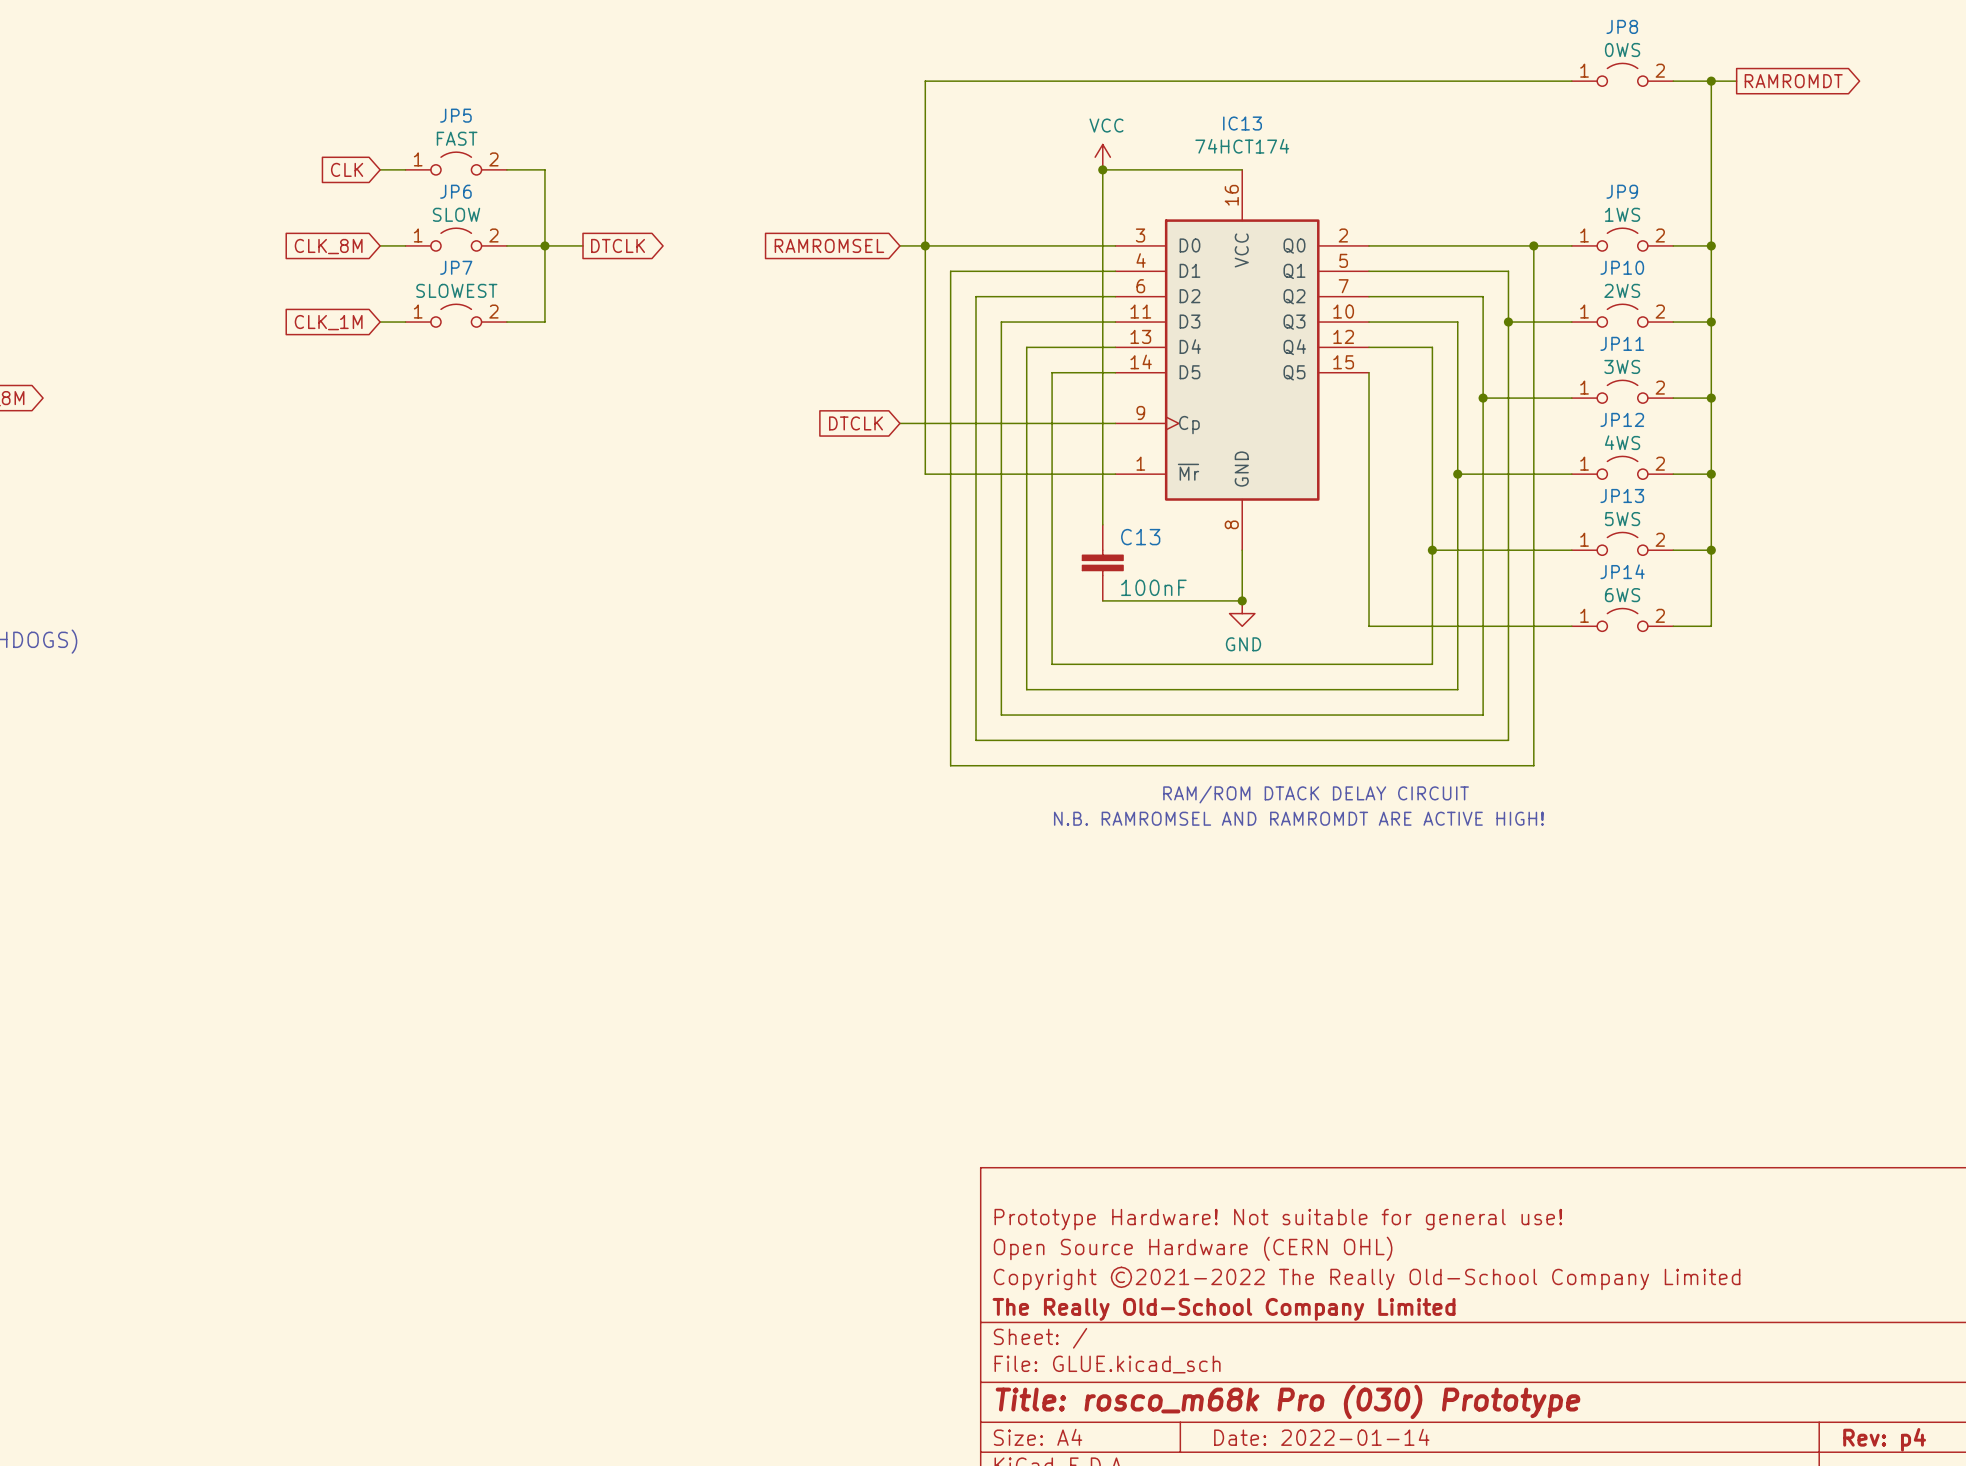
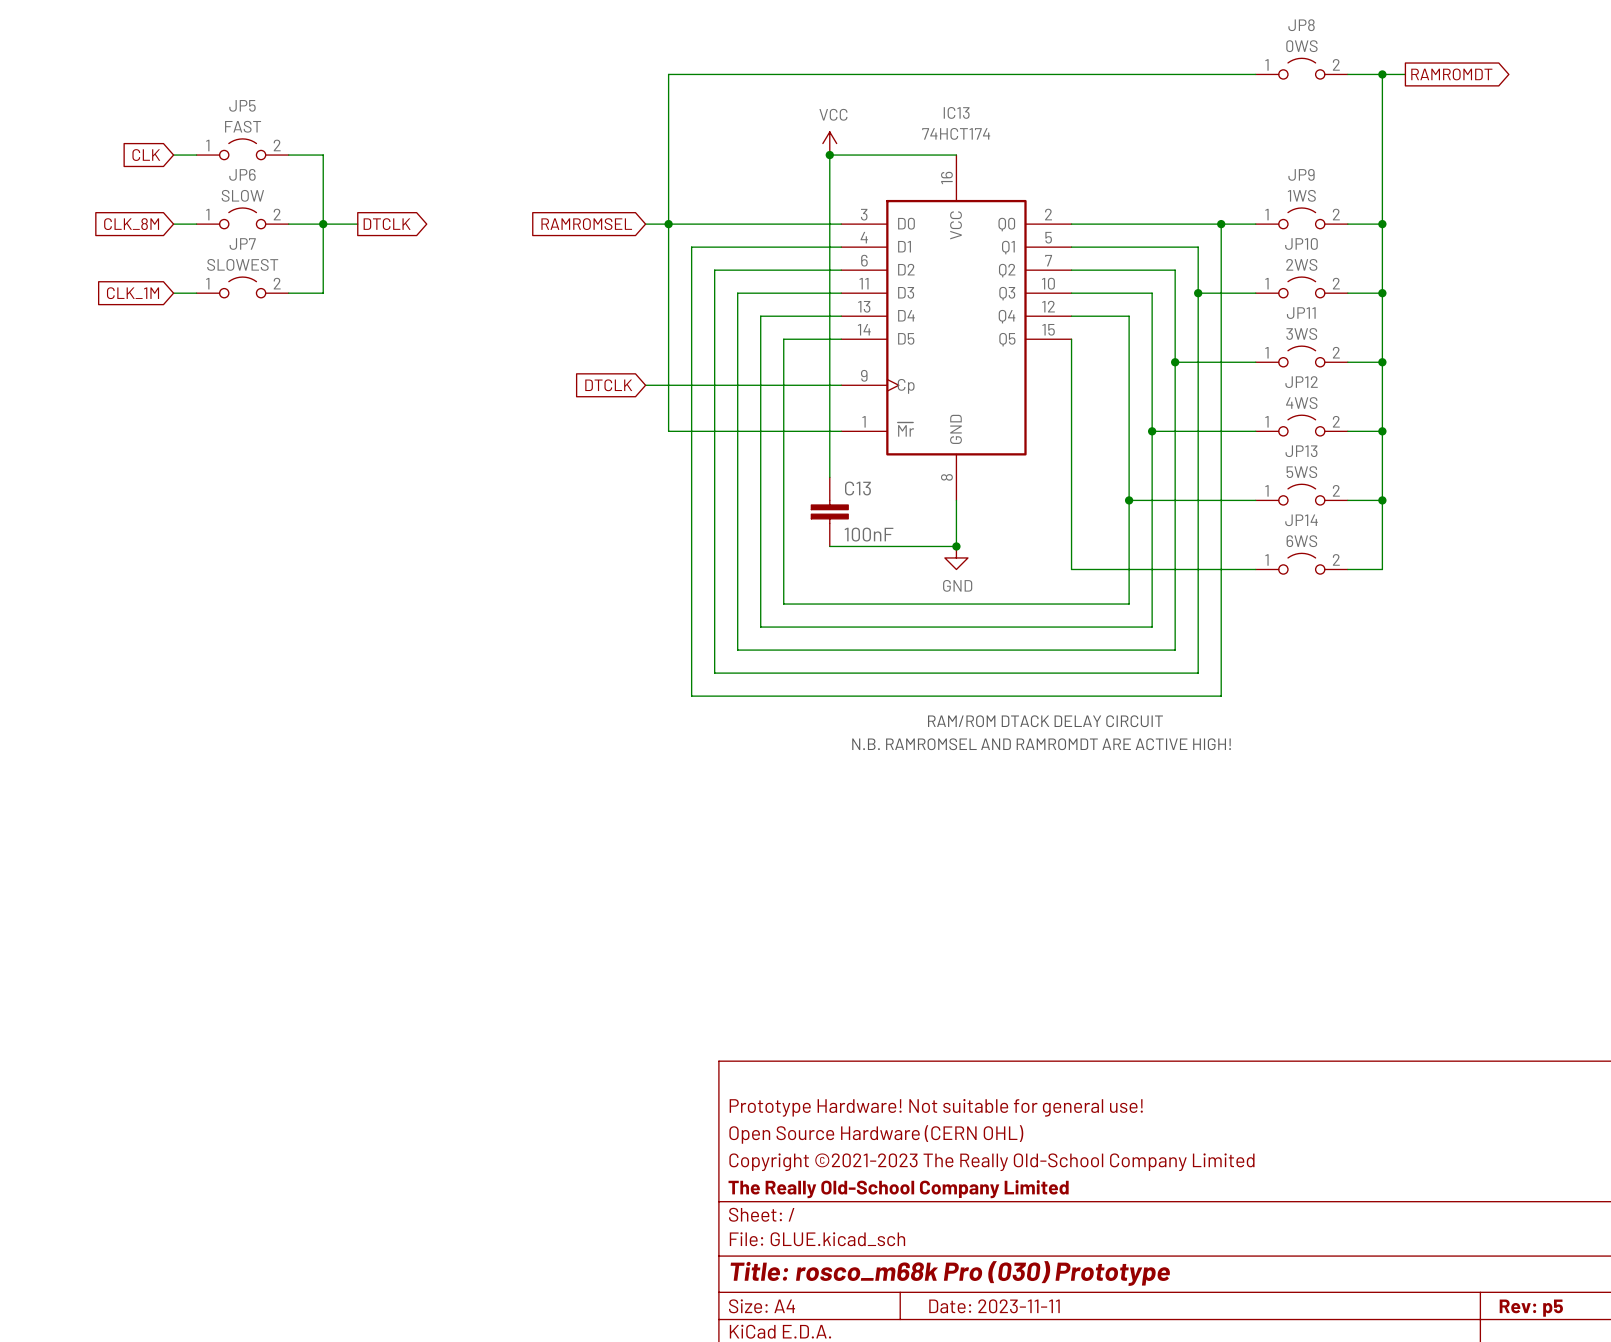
title block: Copyright ©2021-2022 The Really Old-School Company Limited (1367, 1278) -> Copyright ©2021-2023 The Really Old-School Company Limited (991, 1162)
title block: Date: 2022-01-14 (1321, 1437) -> Date: 2023-11-11 (994, 1306)
title block: Rev: p4 (1884, 1439) -> Rev: p5 (1531, 1308)

